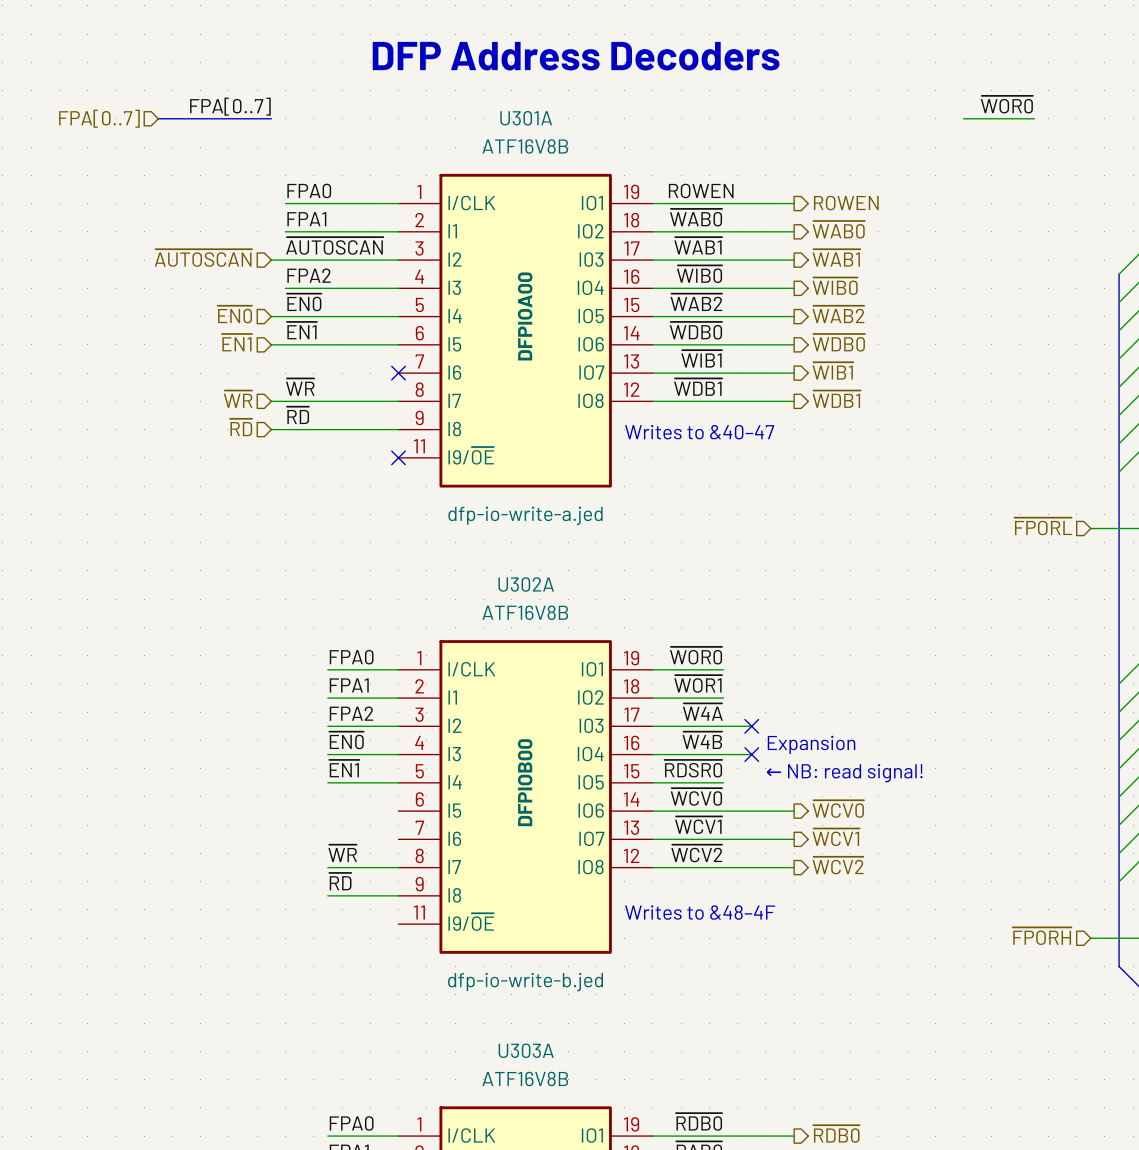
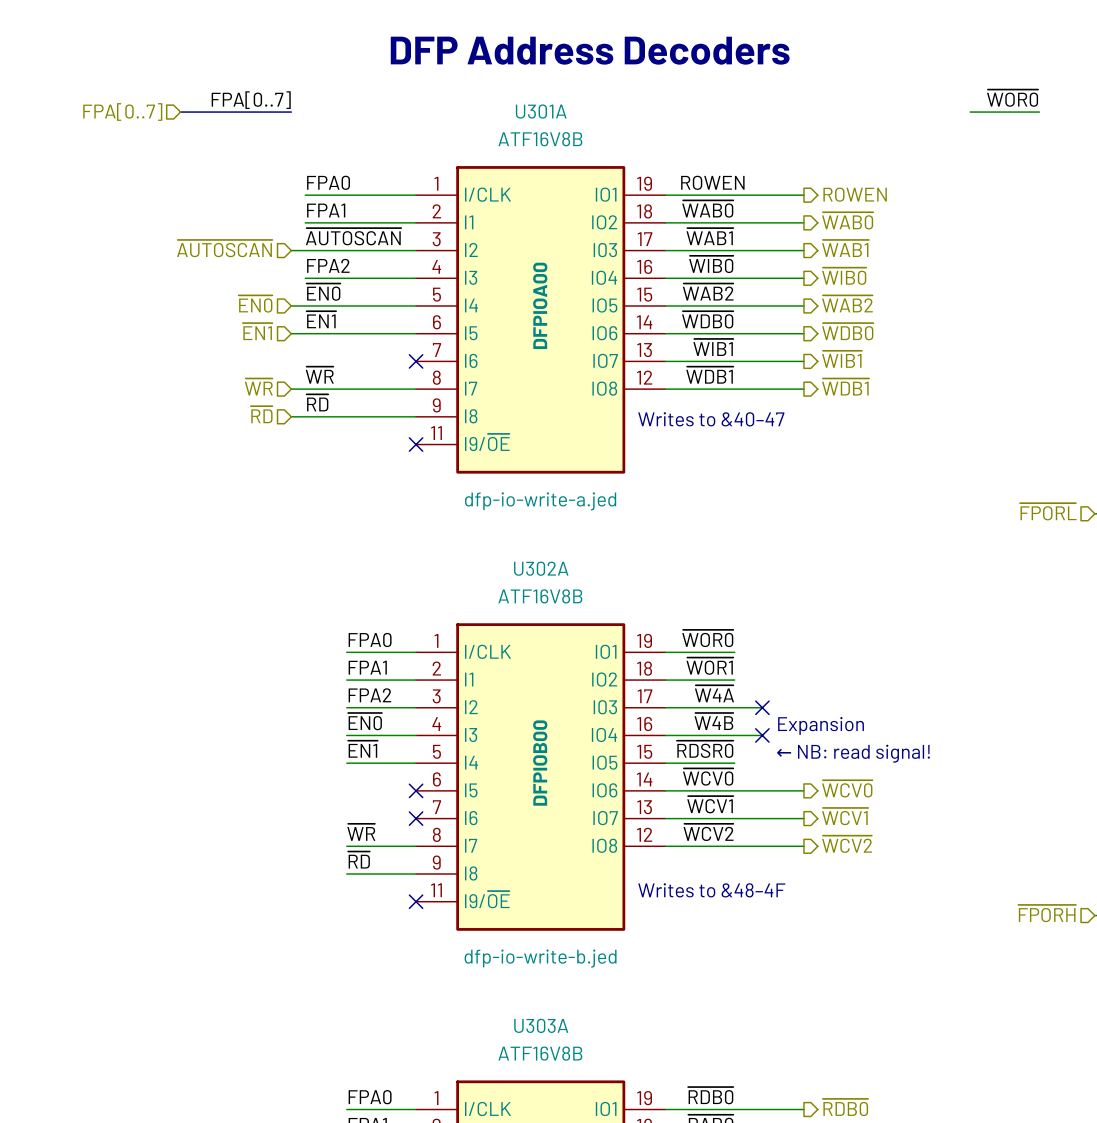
no-connect mark: none -> (416, 790)
no-connect mark: none -> (416, 818)
no-connect mark: none -> (416, 901)

